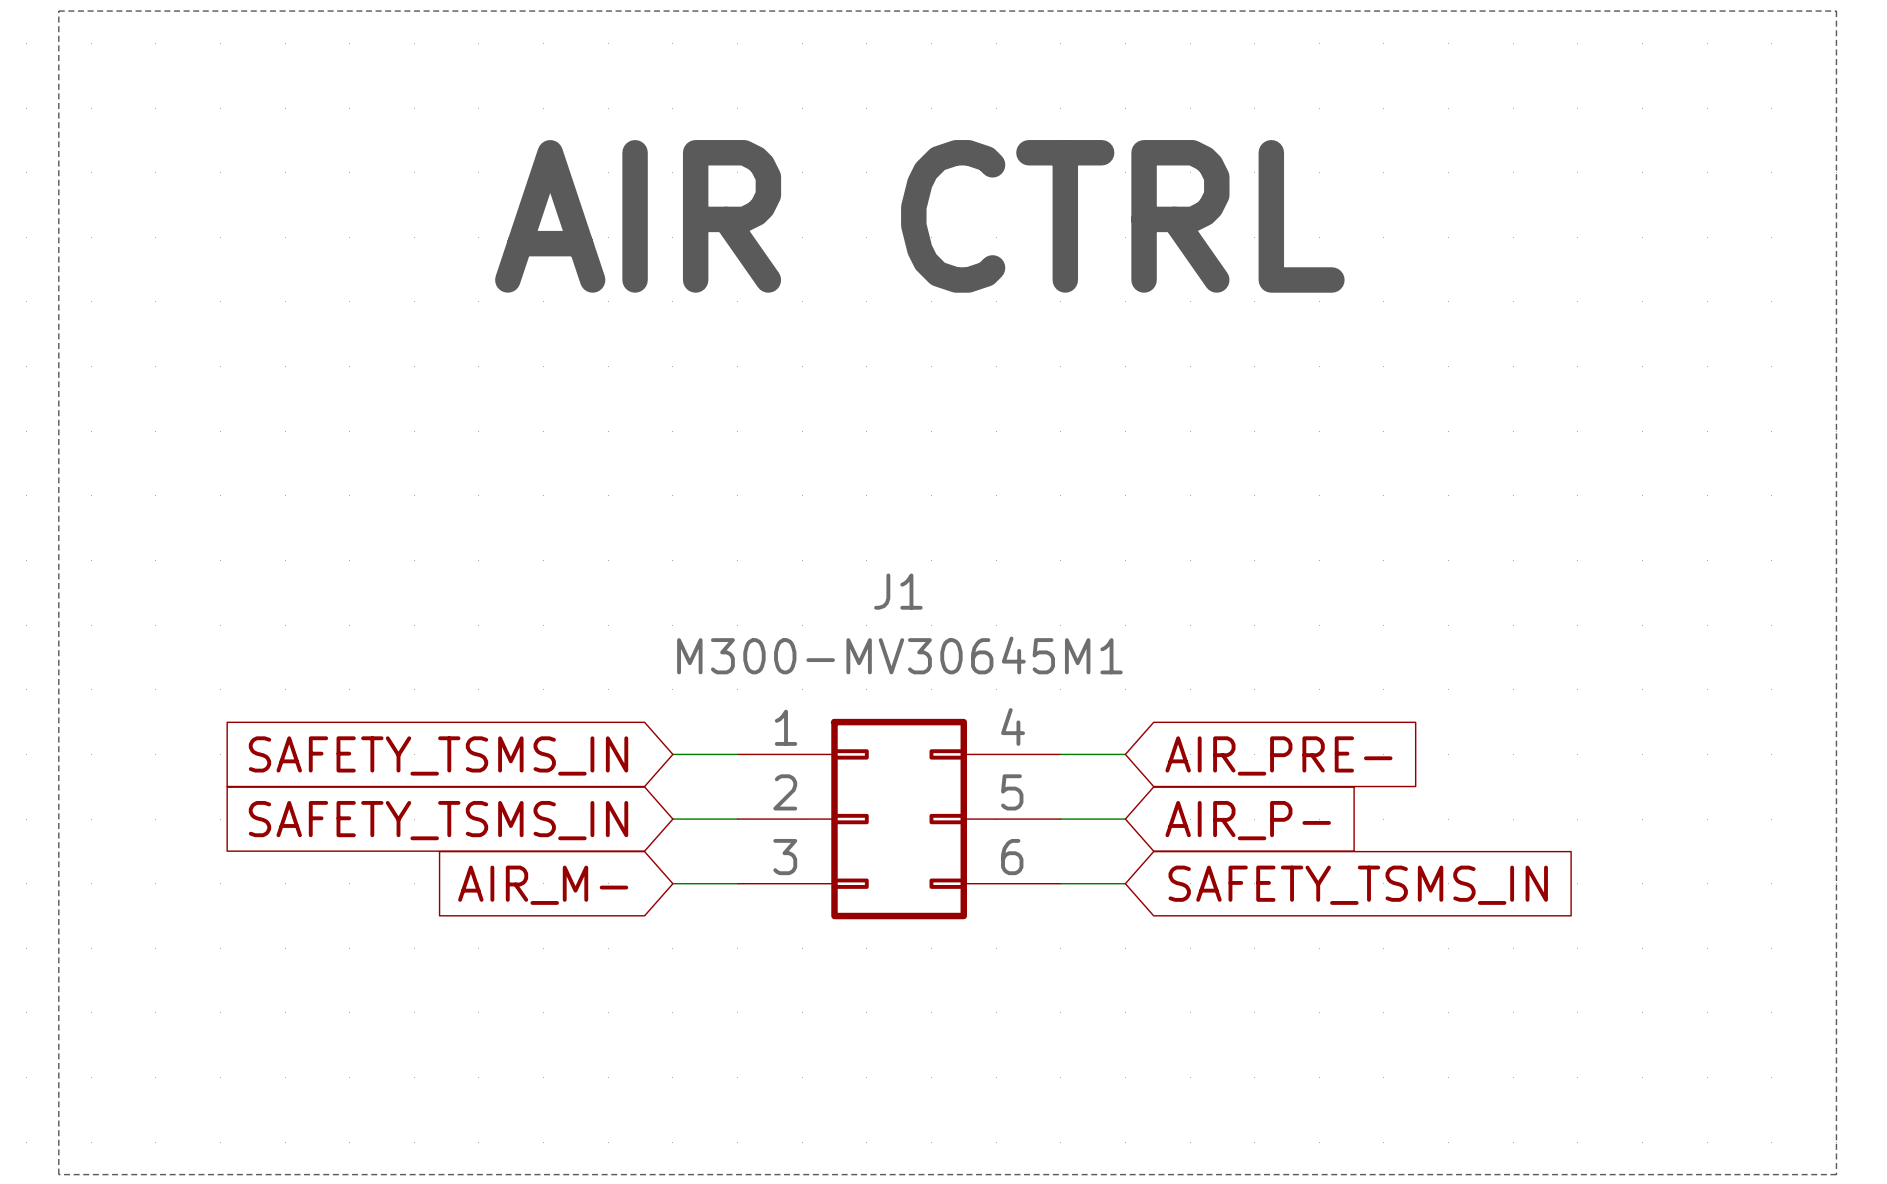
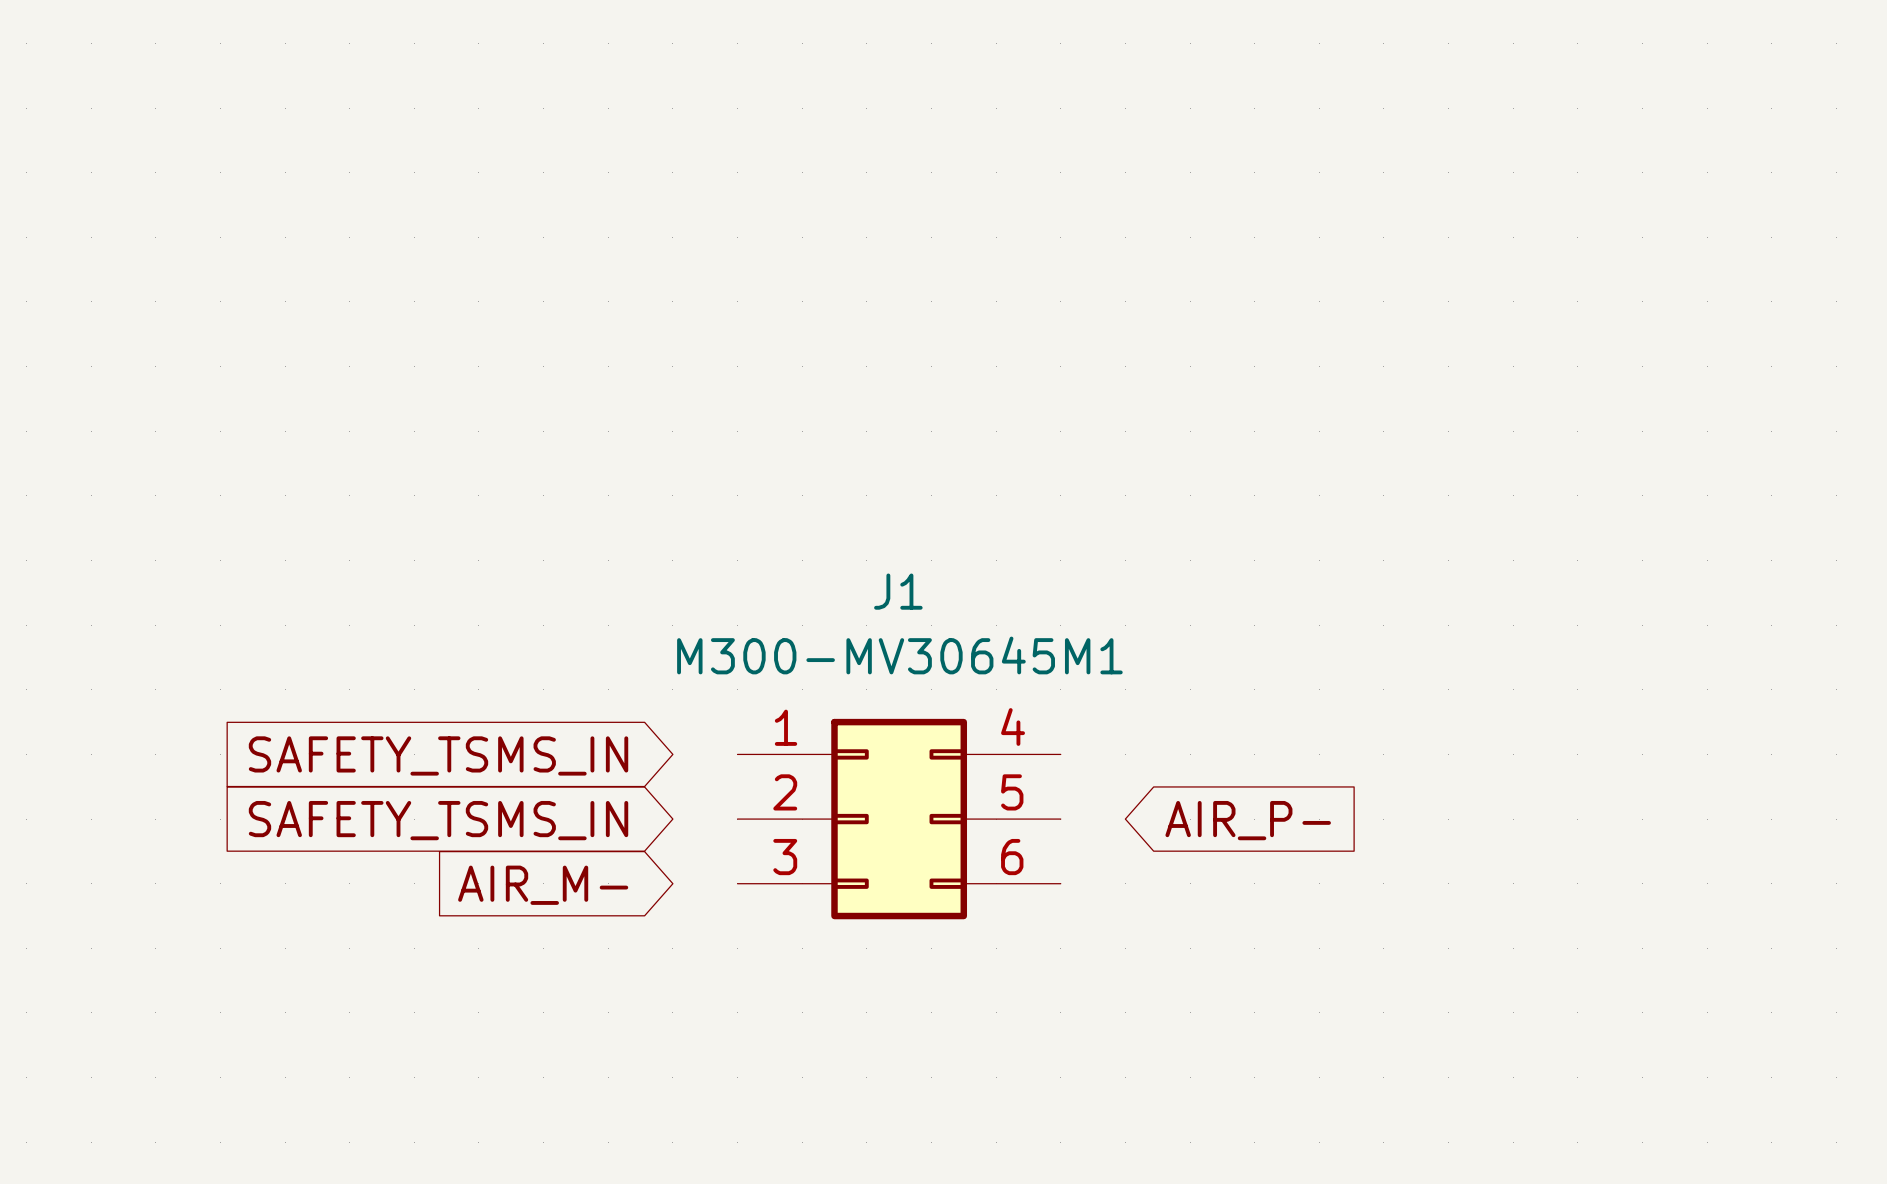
line: (58, 11) (1836, 11) (1836, 1174) (58, 1174) (58, 11) -> none
text: AIR CTRL (919, 216) -> none
wire: (672, 754) (737, 754) -> none
wire: (1060, 754) (1125, 754) -> none
global label: AIR_PRE- (1278, 755) -> none
wire: (672, 819) (737, 819) -> none
wire: (1060, 819) (1125, 819) -> none
wire: (672, 883) (737, 883) -> none
wire: (1060, 883) (1125, 883) -> none
global label: SAFETY_TSMS_IN (1358, 885) -> none

